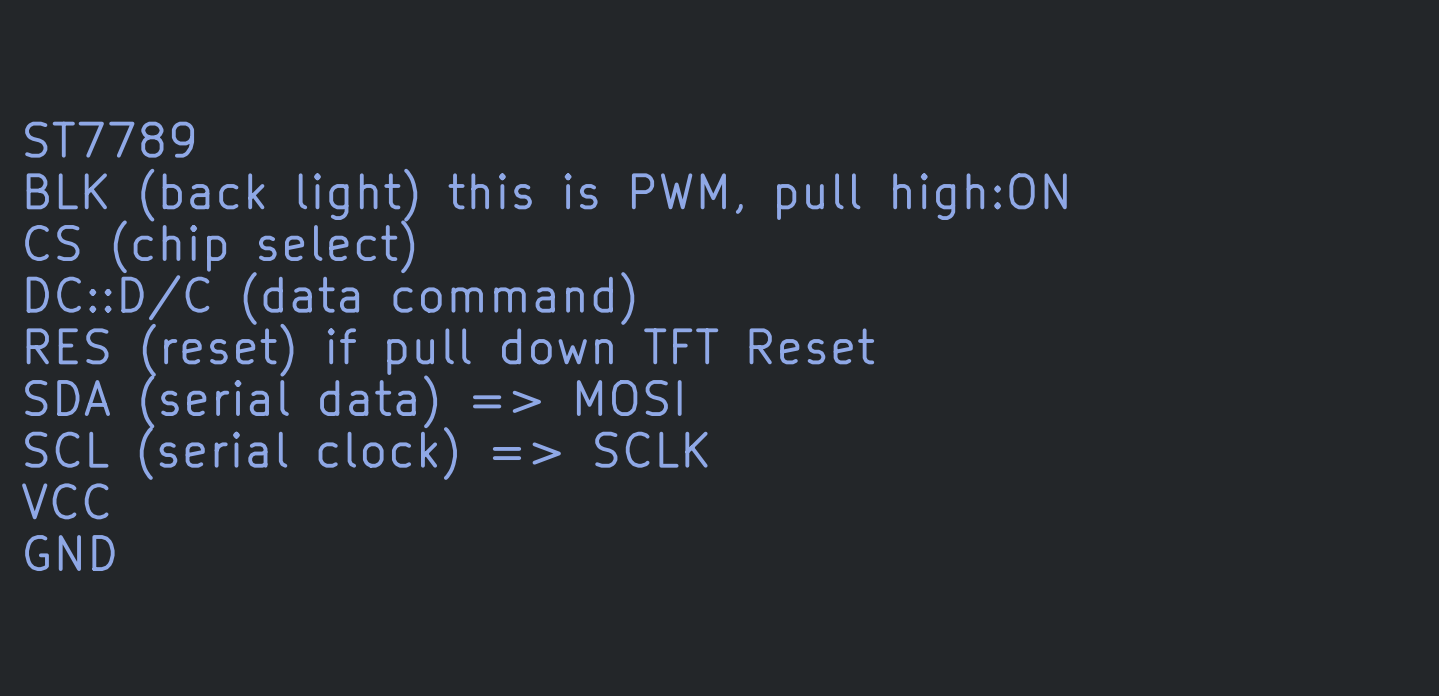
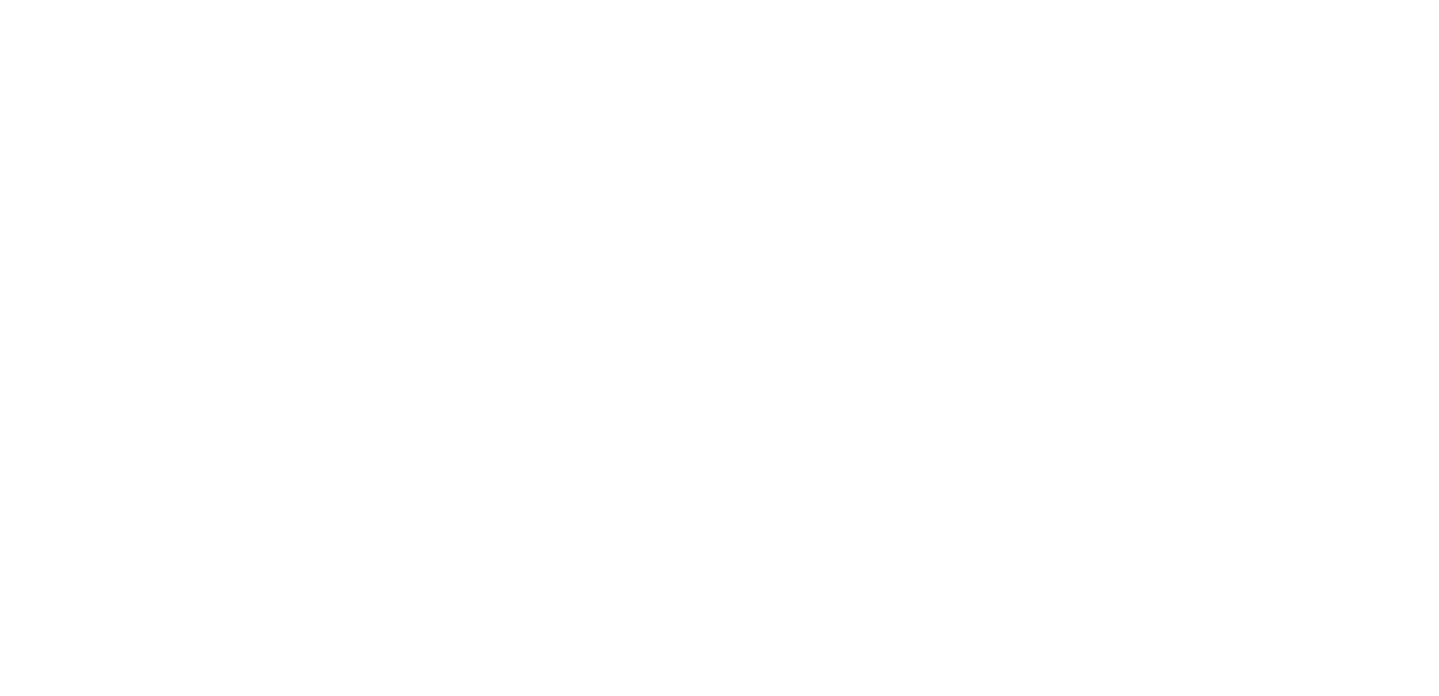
text: ST7789 (109, 139) -> none
text: BLK (back light) this is PWM, pull high:ON (546, 195) -> none
text: CS (chip select) (219, 246) -> none
text: DC::D/C (data command) (330, 298) -> none
text: RES (reset) if pull down TFT Reset (450, 350) -> none
text: SDA (serial data) => MOSI (353, 401) -> none
text: SCL (serial clock) => SCLK (366, 453) -> none
text: VCC (65, 501) -> none
text: GND (69, 553) -> none

